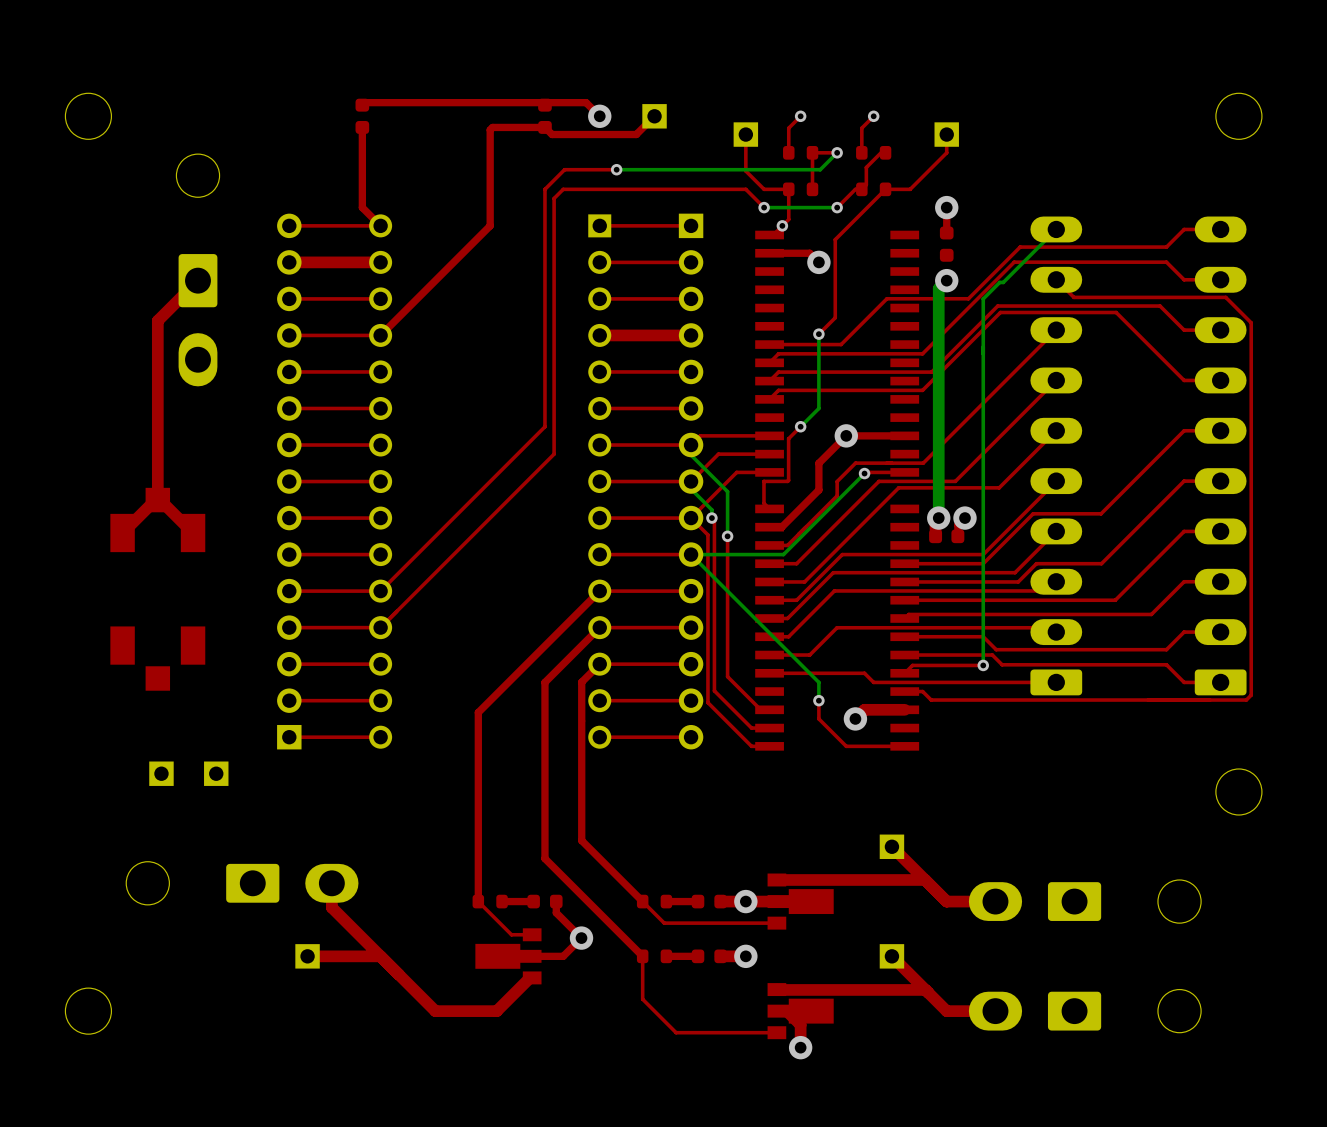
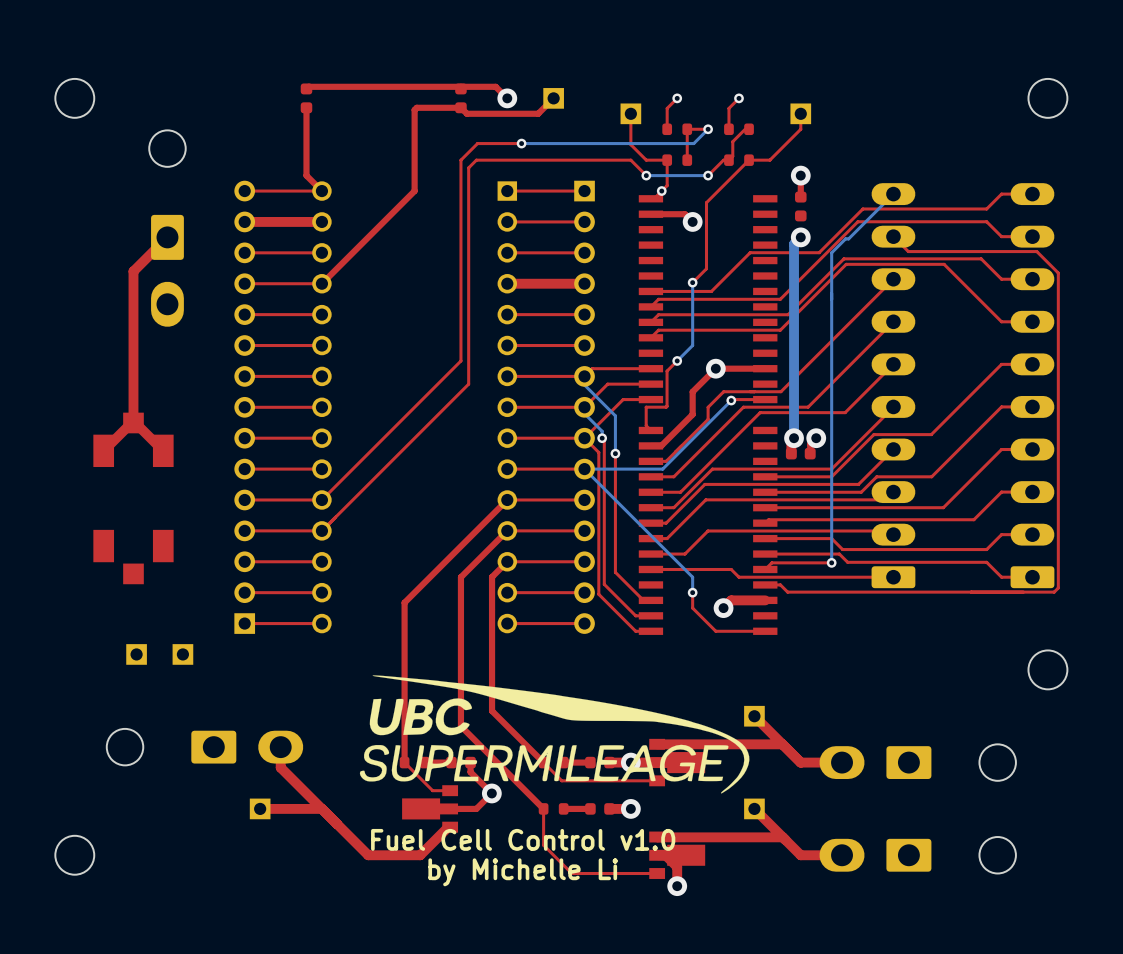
drawing: none -> [359, 675, 750, 794]
text: none -> Fuel Cell Control v1.0 (523, 839)
text: none -> by Michelle Li (523, 872)

